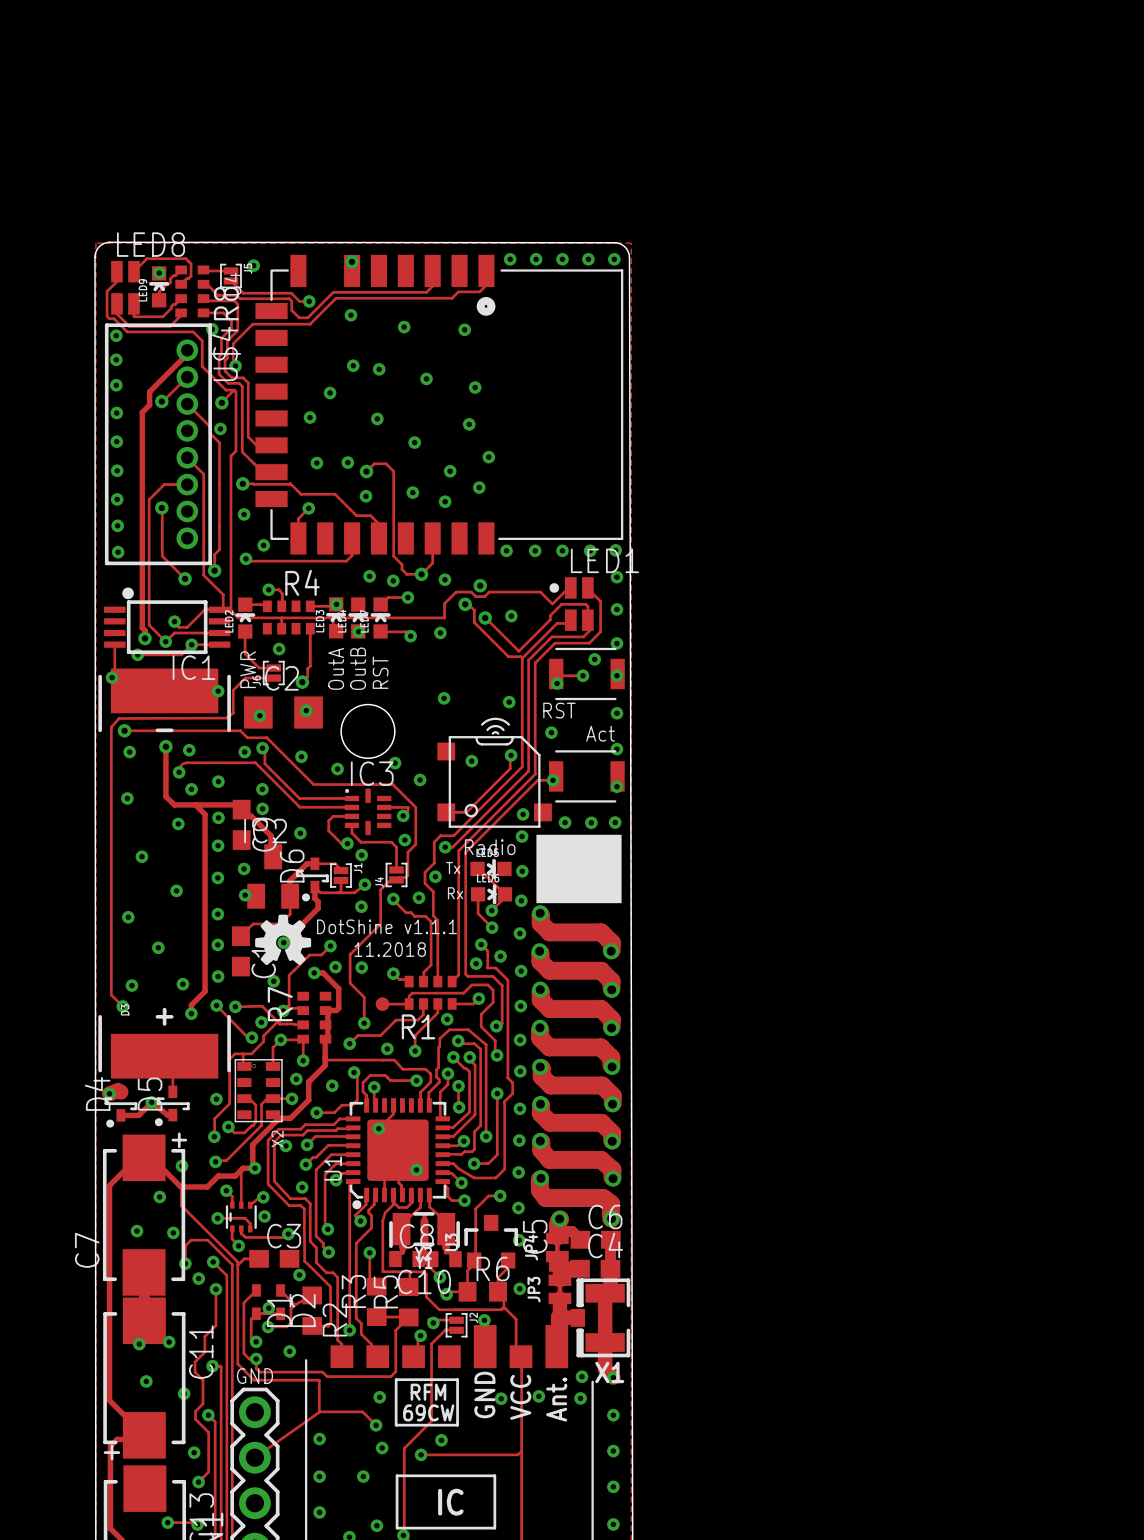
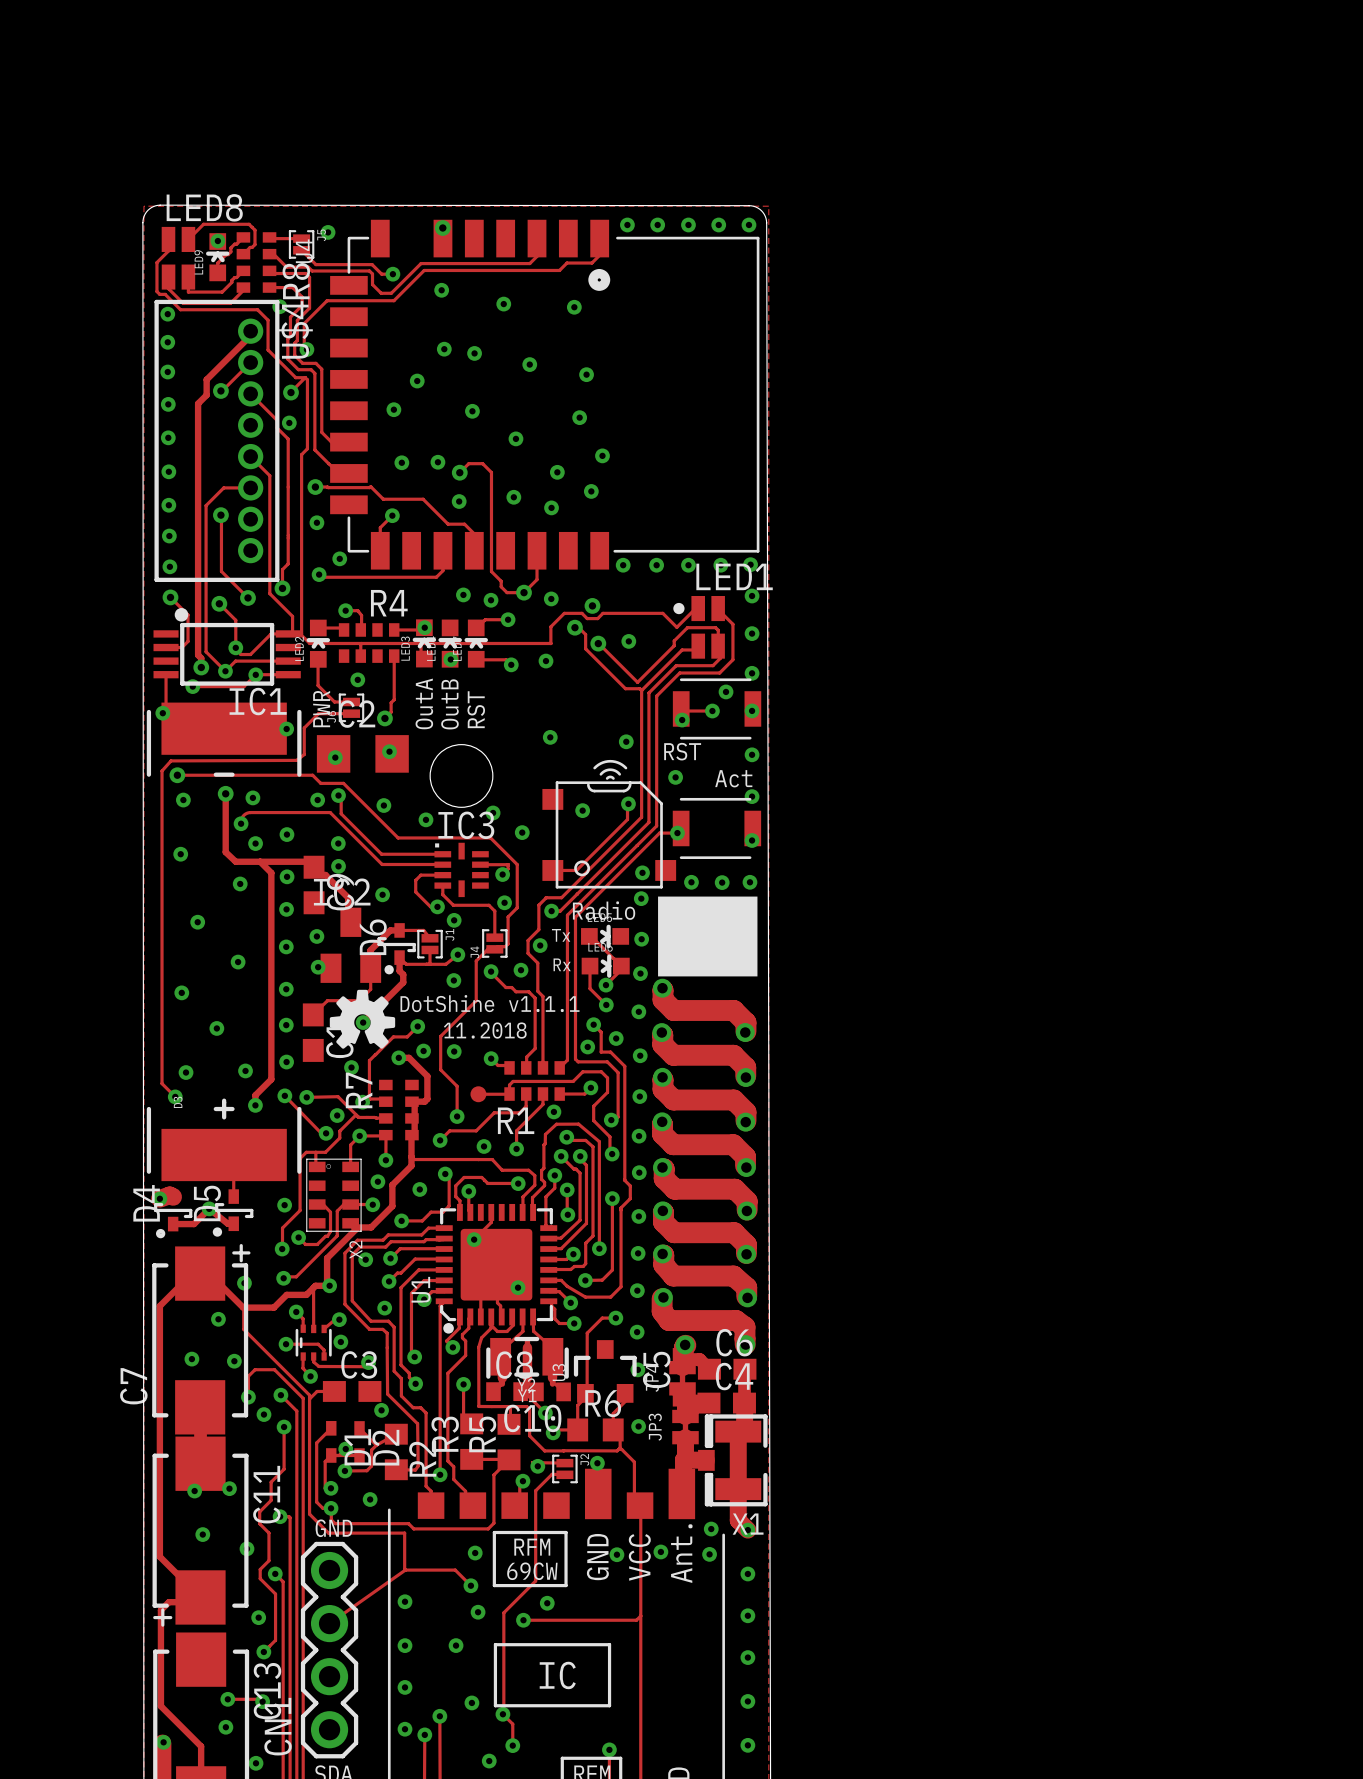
track: none -> (170, 597) (188, 614) (188, 641) (181, 647) (166, 647)
via: none -> (170, 597)
track: none -> (219, 603) (235, 620) (235, 647)
via: none -> (219, 603)

